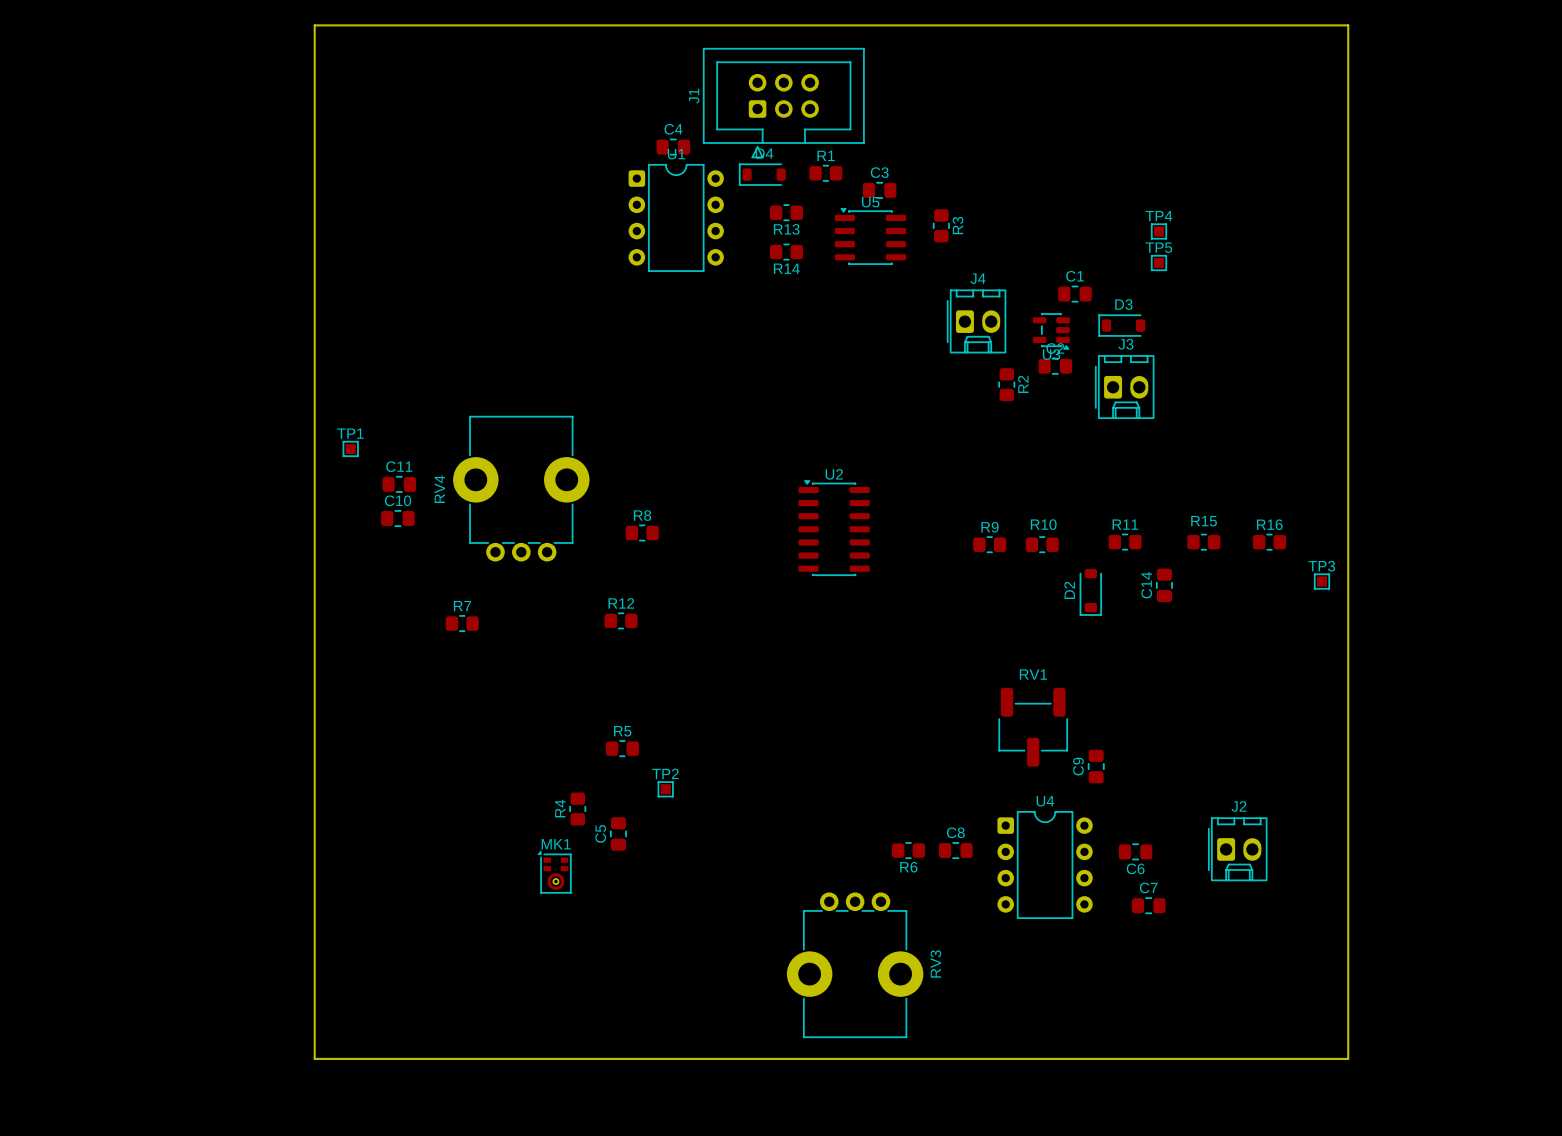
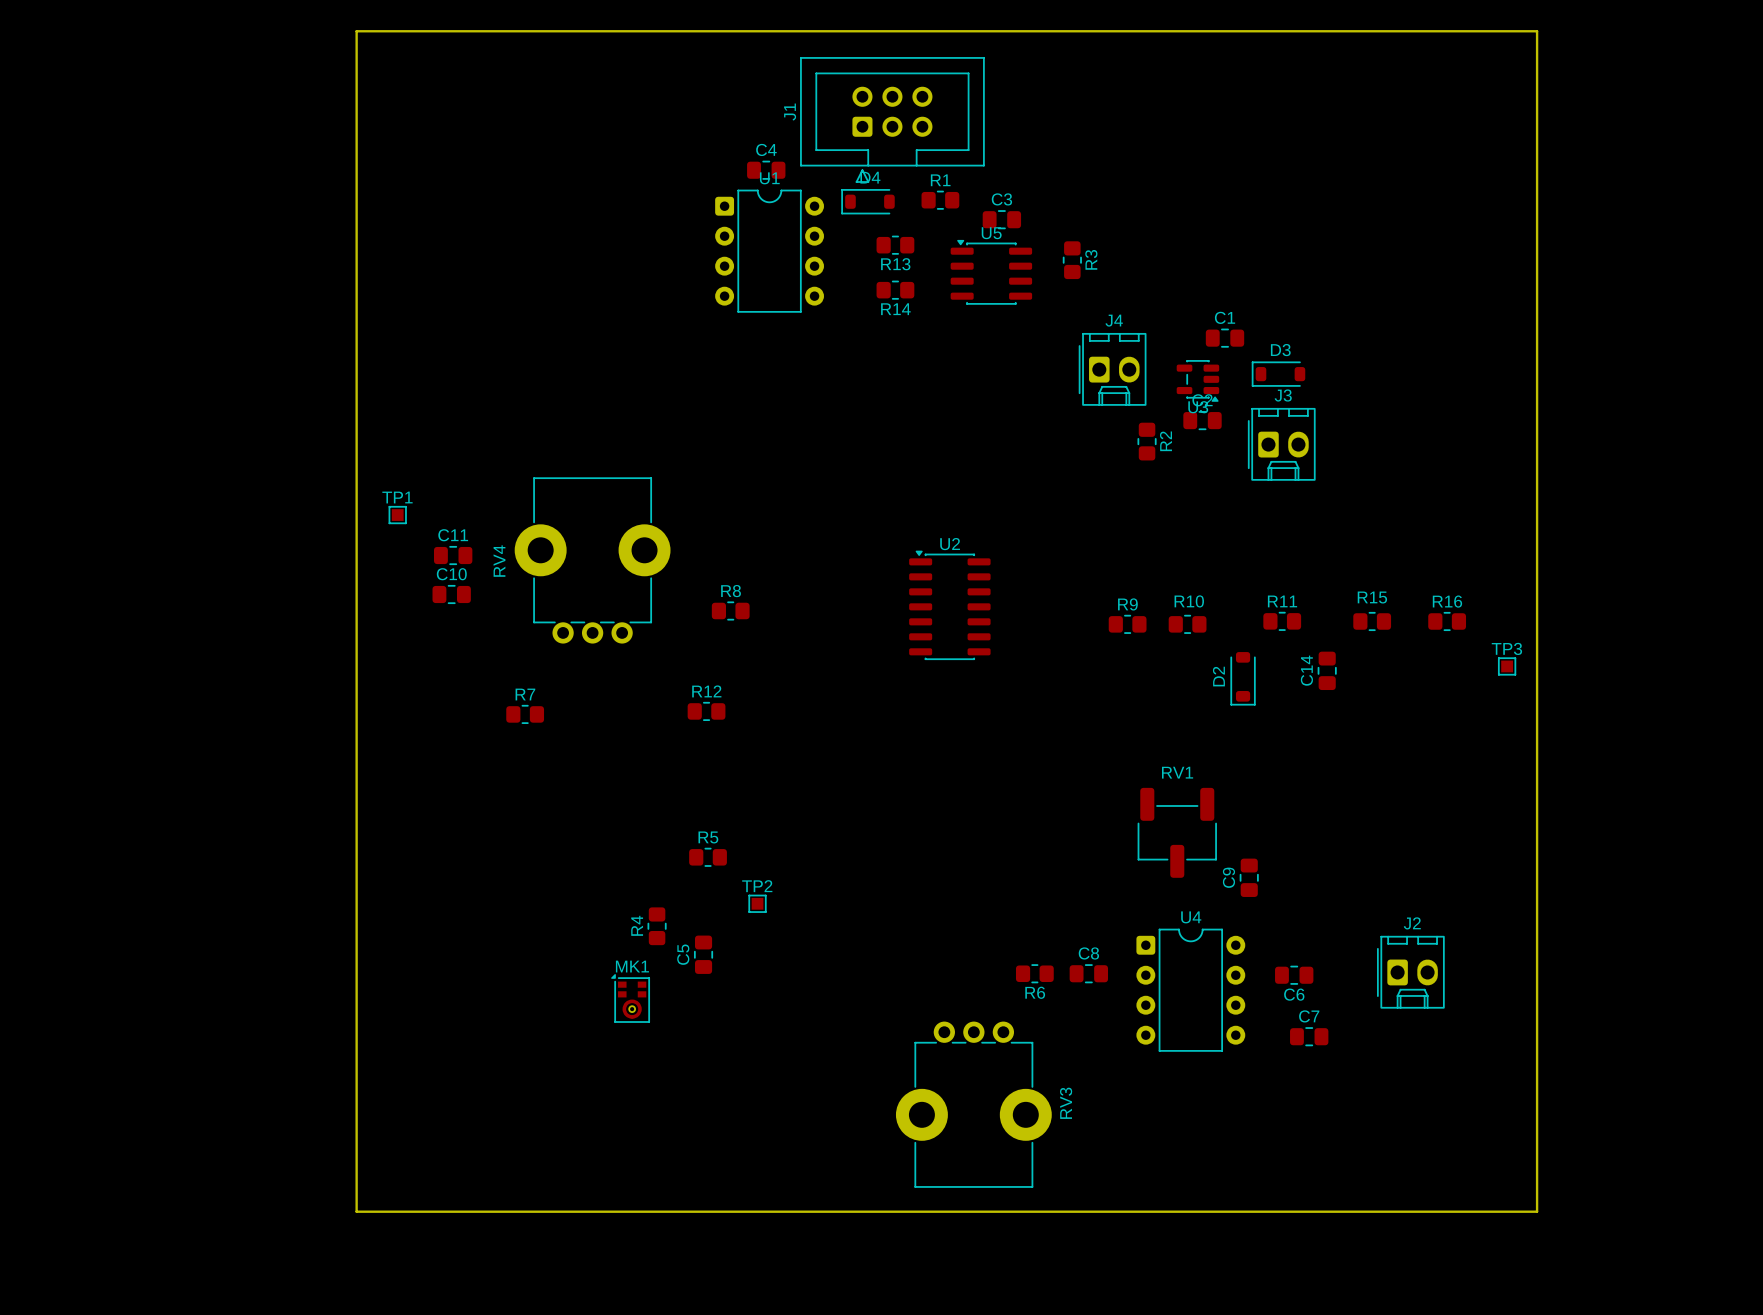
TP4: (1159, 231) -> none
TP5: (1159, 262) -> none

